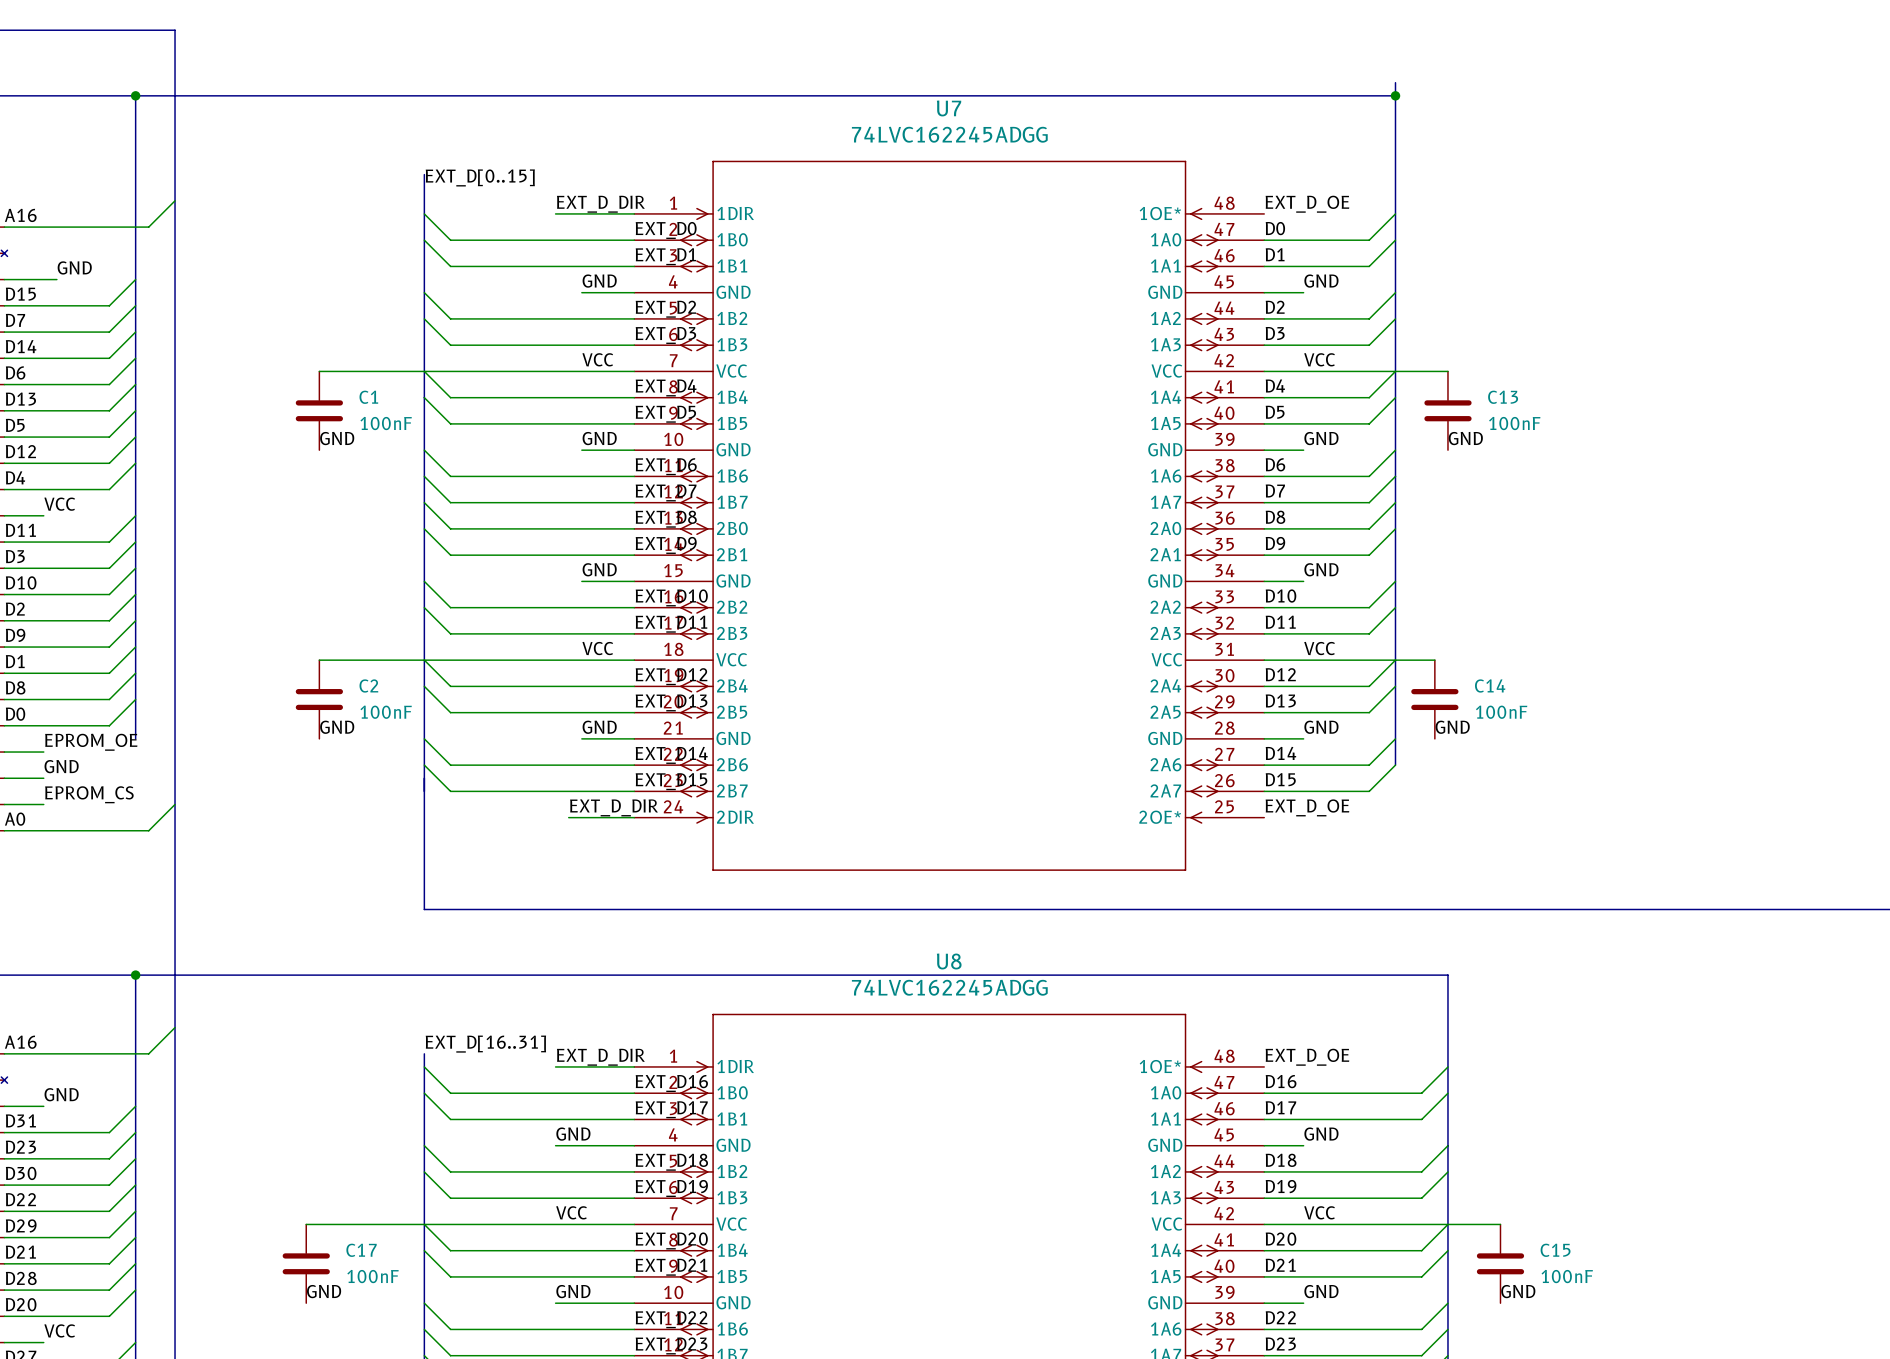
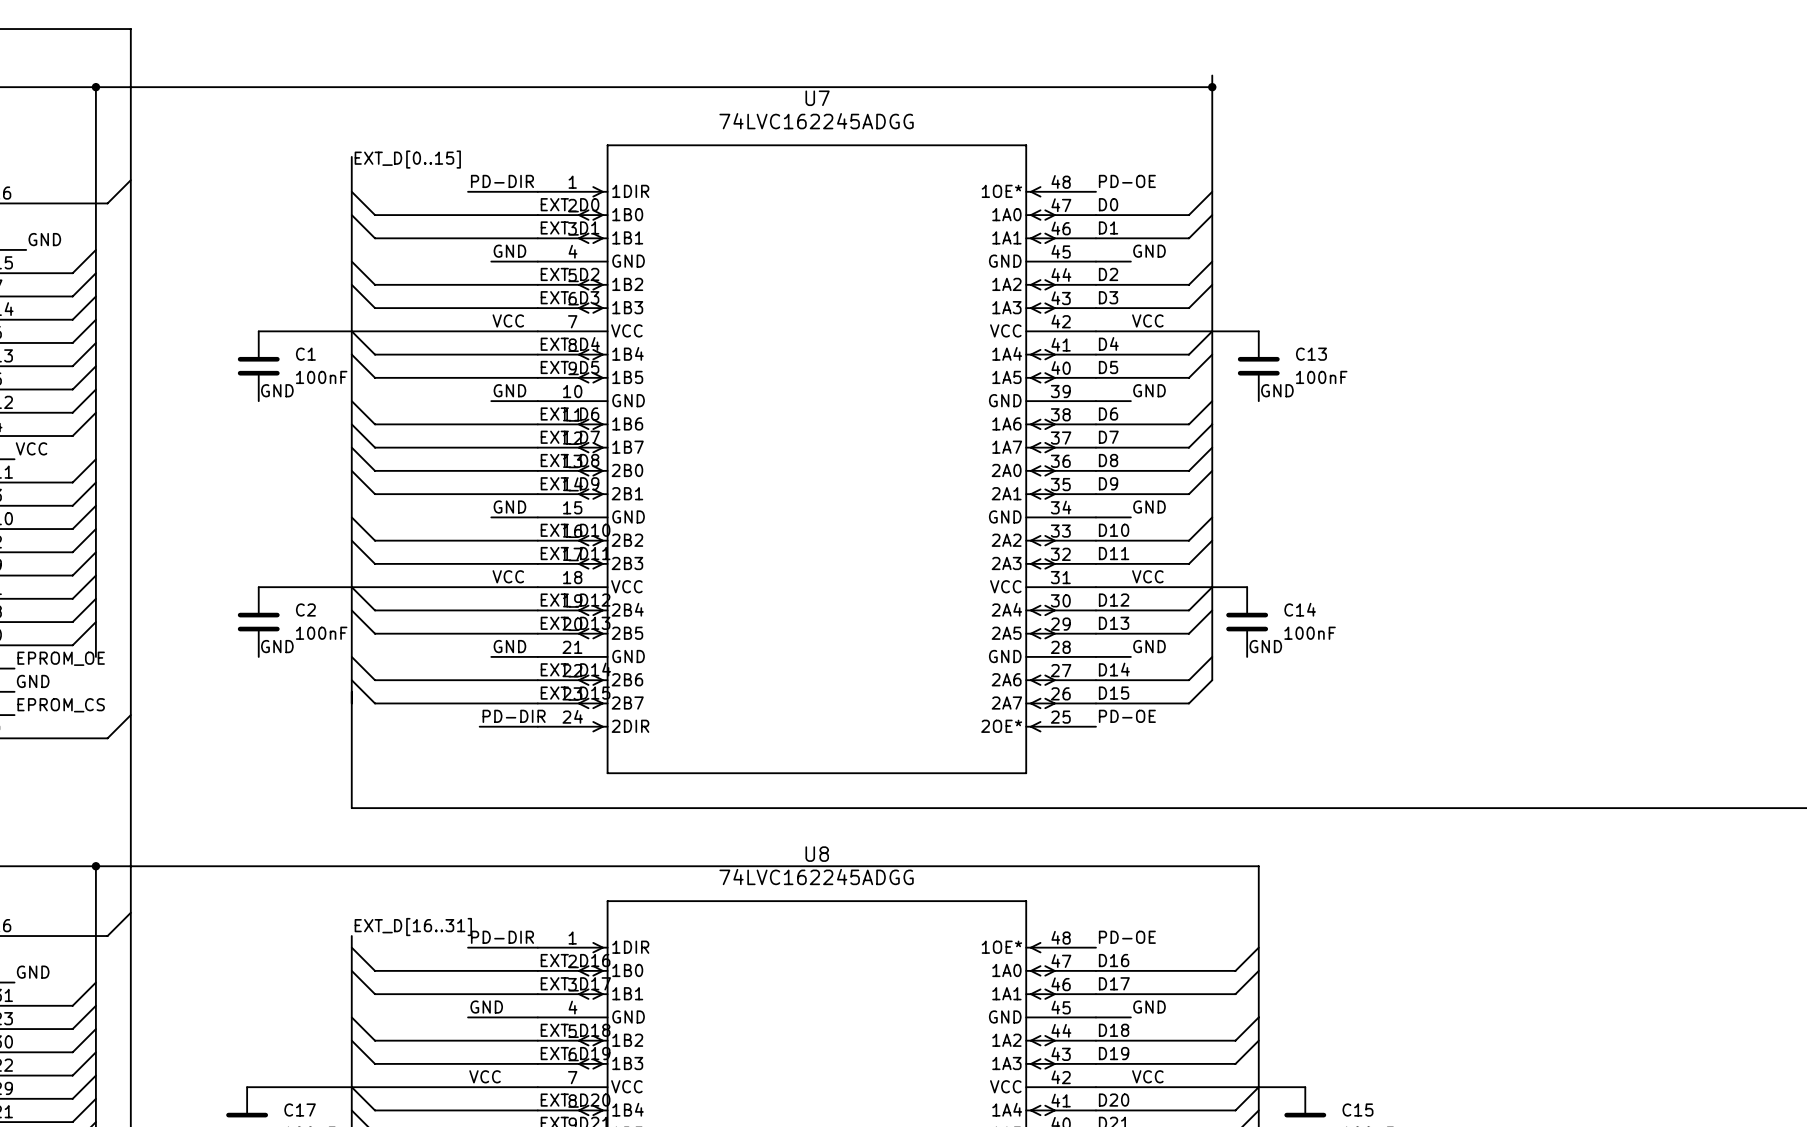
label: EXT_D_DIR (600, 204) -> PD-DIR (502, 181)
label: EXT_D_OE (1307, 204) -> PD-OE (1127, 181)
label: EXT_D_DIR (614, 807) -> PD-DIR (514, 716)
label: EXT_D_OE (1307, 807) -> PD-OE (1127, 716)
label: EXT_D_DIR (600, 1057) -> PD-DIR (502, 937)
label: EXT_D_OE (1307, 1057) -> PD-OE (1127, 937)

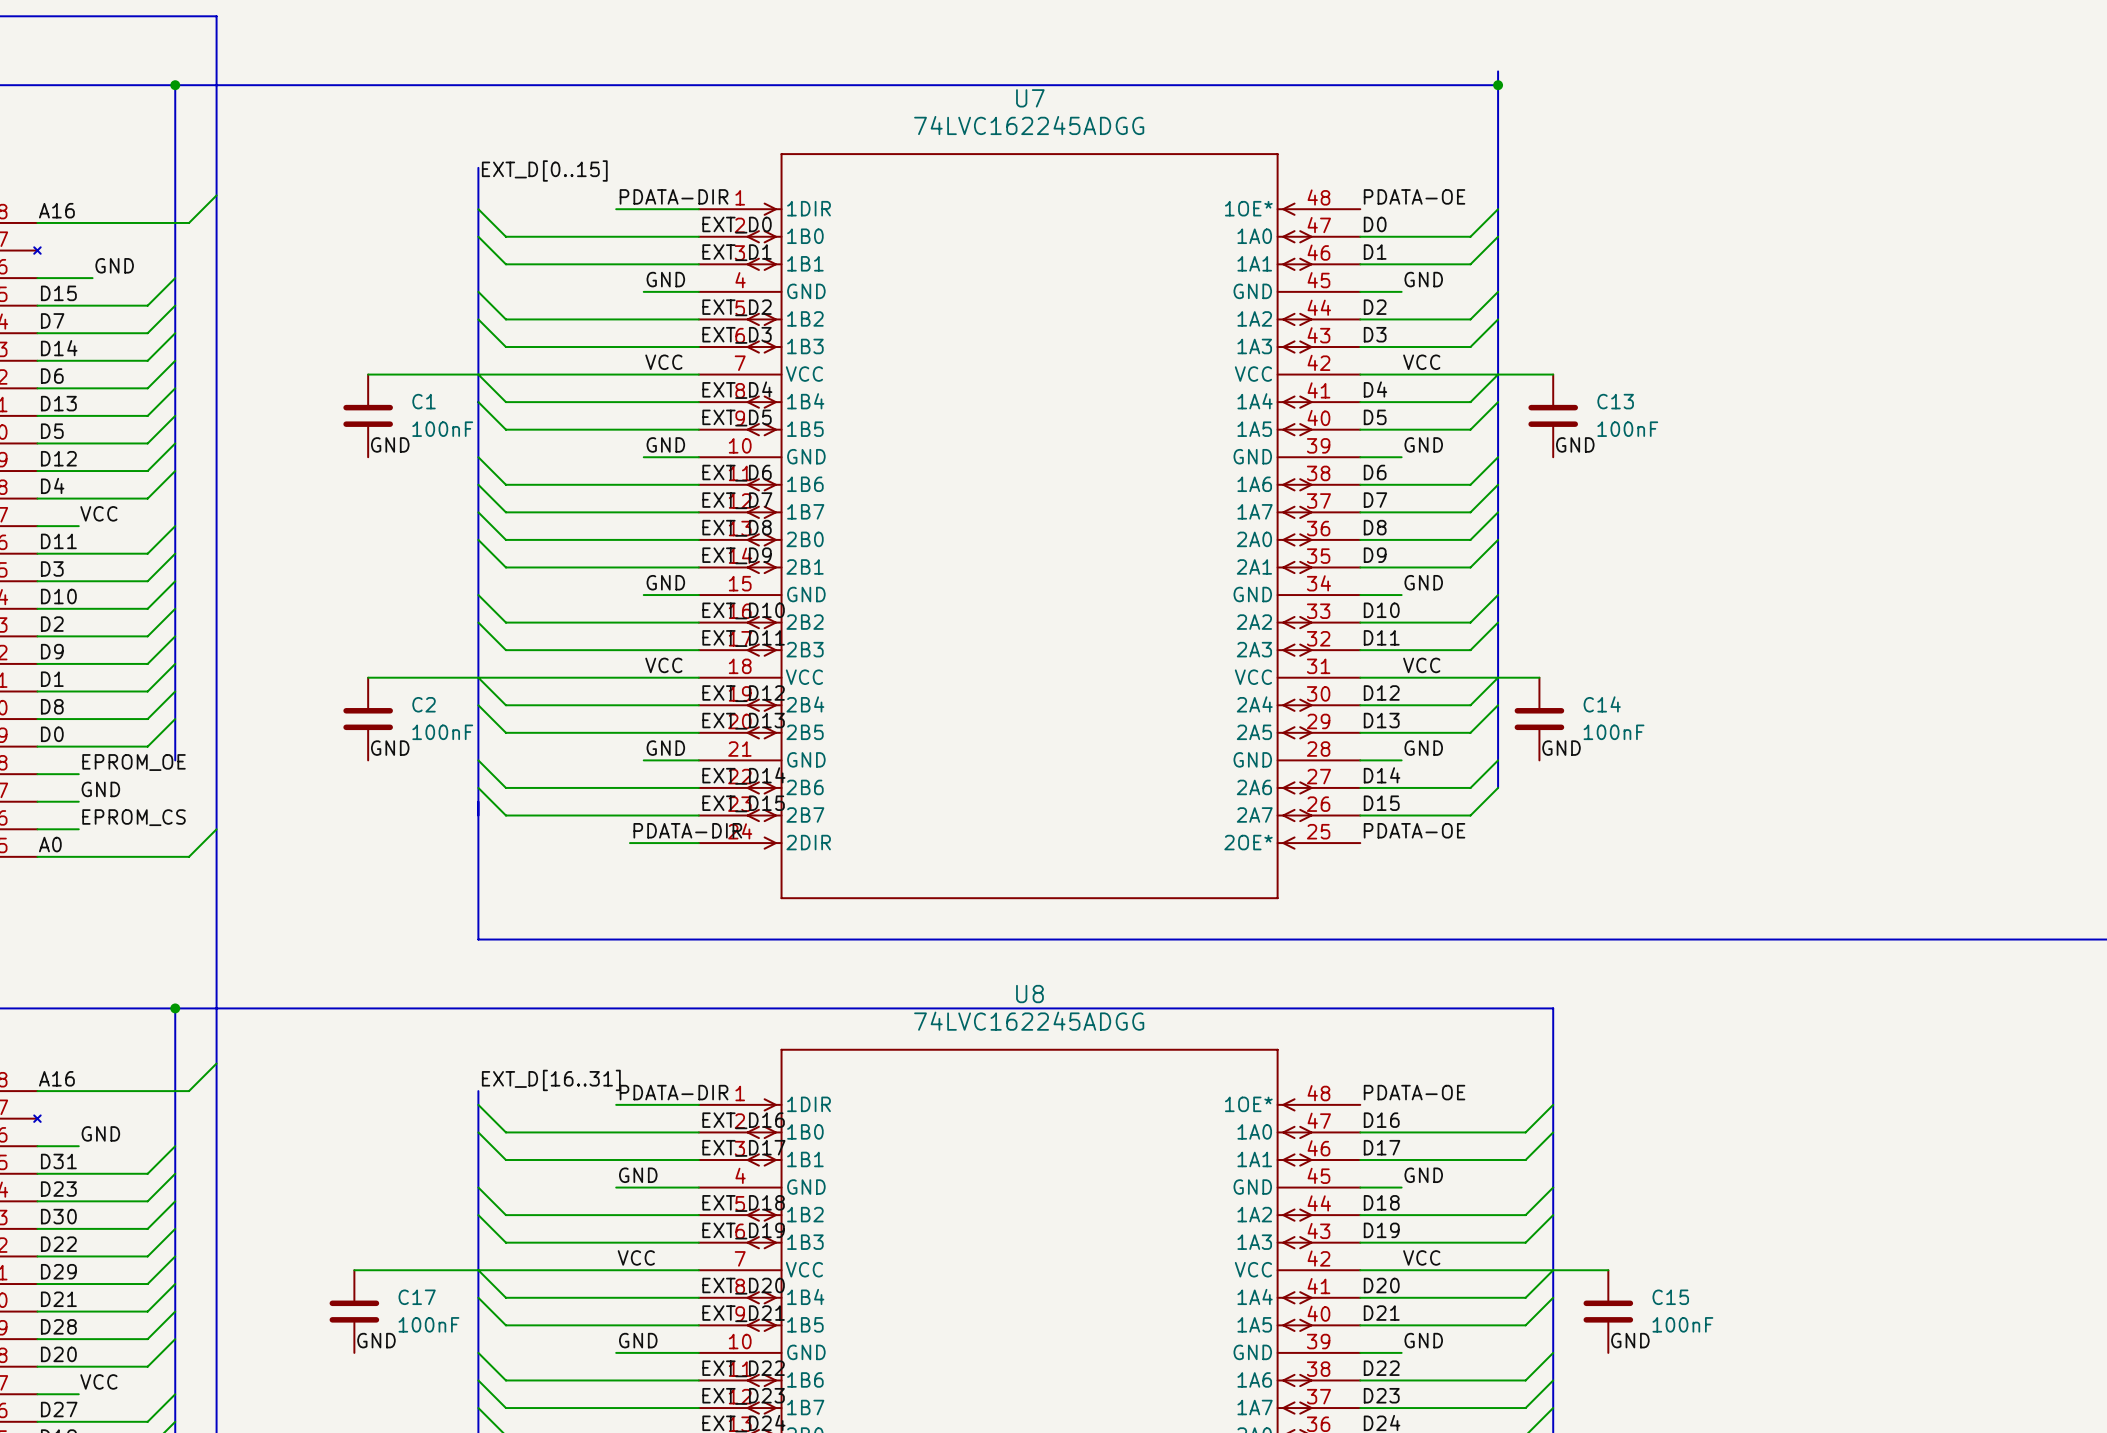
label: PD-DIR (502, 181) -> PDATA-DIR (674, 196)
label: PD-OE (1127, 181) -> PDATA-OE (1414, 196)
label: PD-DIR (514, 716) -> PDATA-DIR (687, 830)
label: PD-OE (1127, 716) -> PDATA-OE (1414, 830)
label: PD-DIR (502, 937) -> PDATA-DIR (674, 1092)
label: PD-OE (1127, 937) -> PDATA-OE (1414, 1092)

